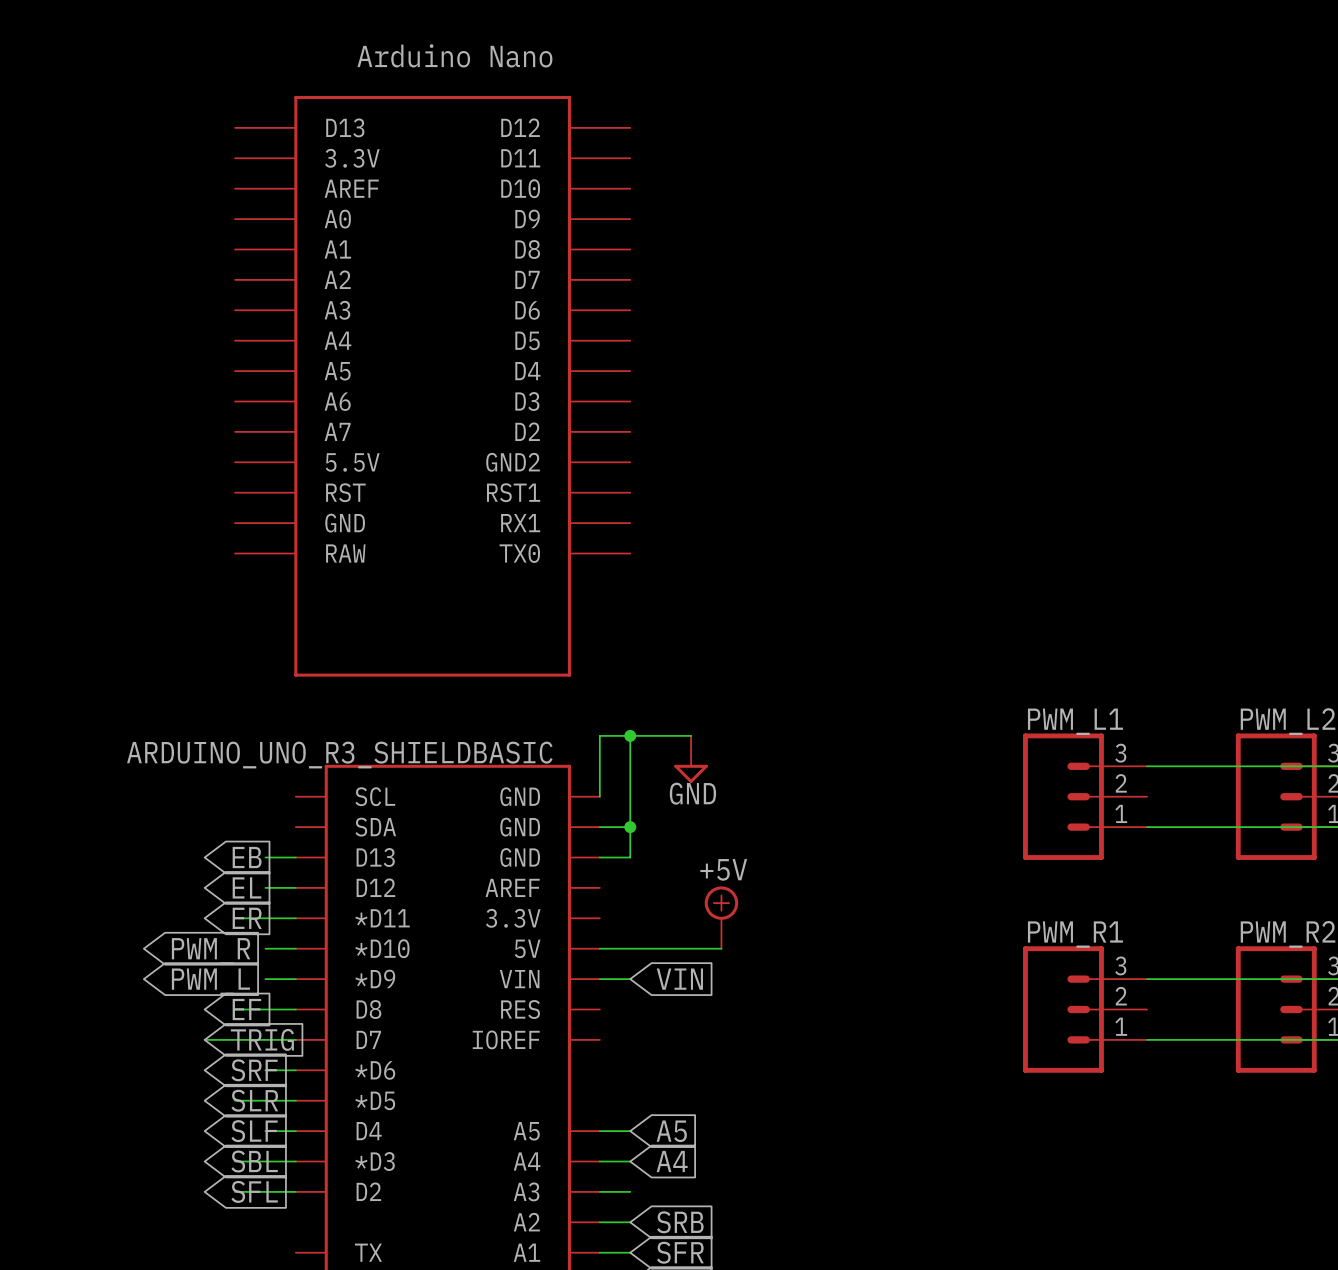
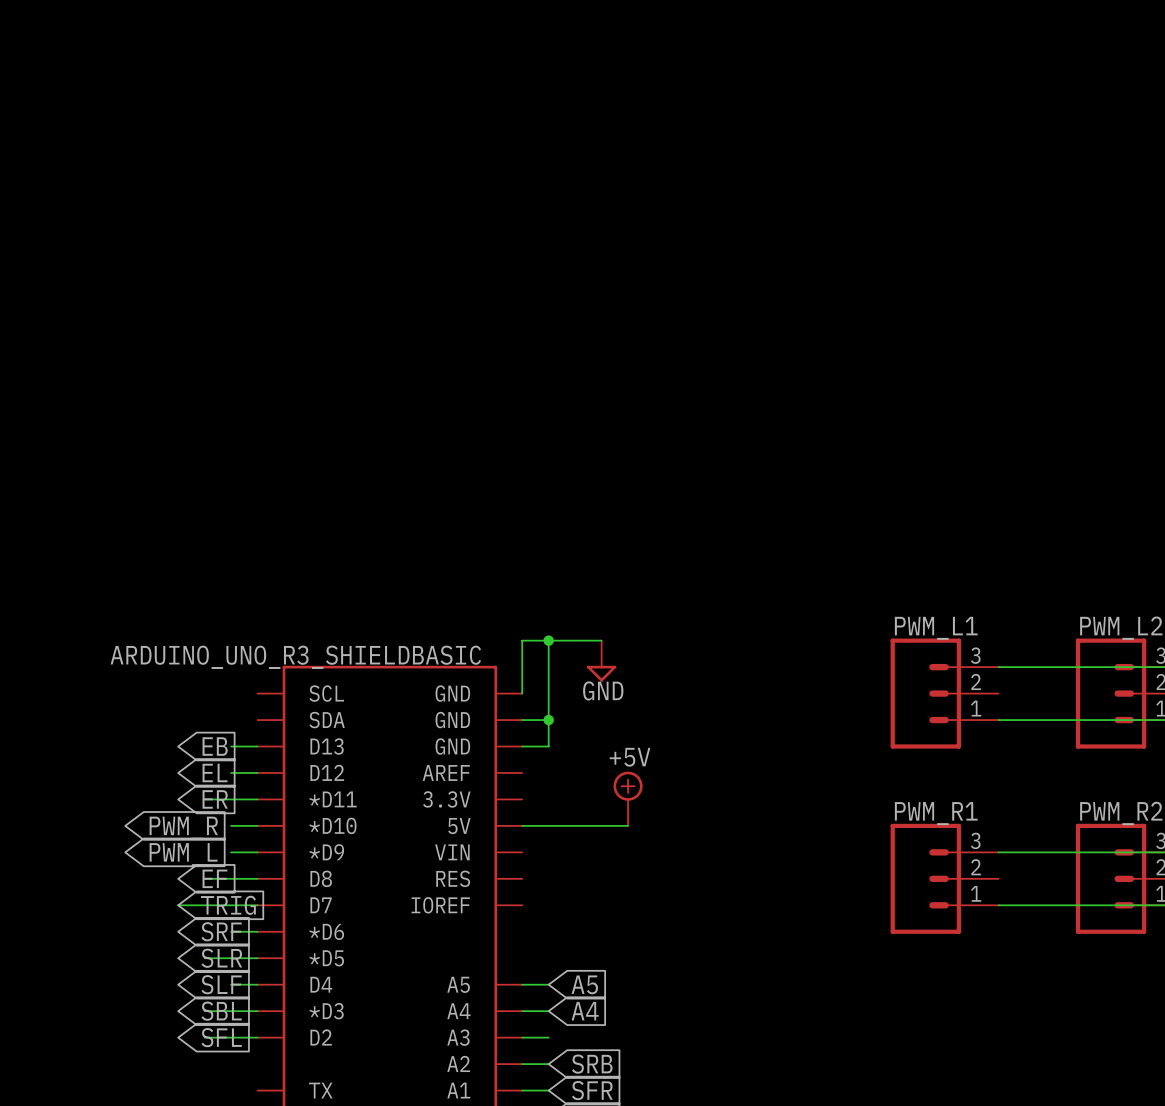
part: (432, 386) -> none
wire: (599, 979) (630, 979) -> none
global label: VIN (679, 979) -> none

